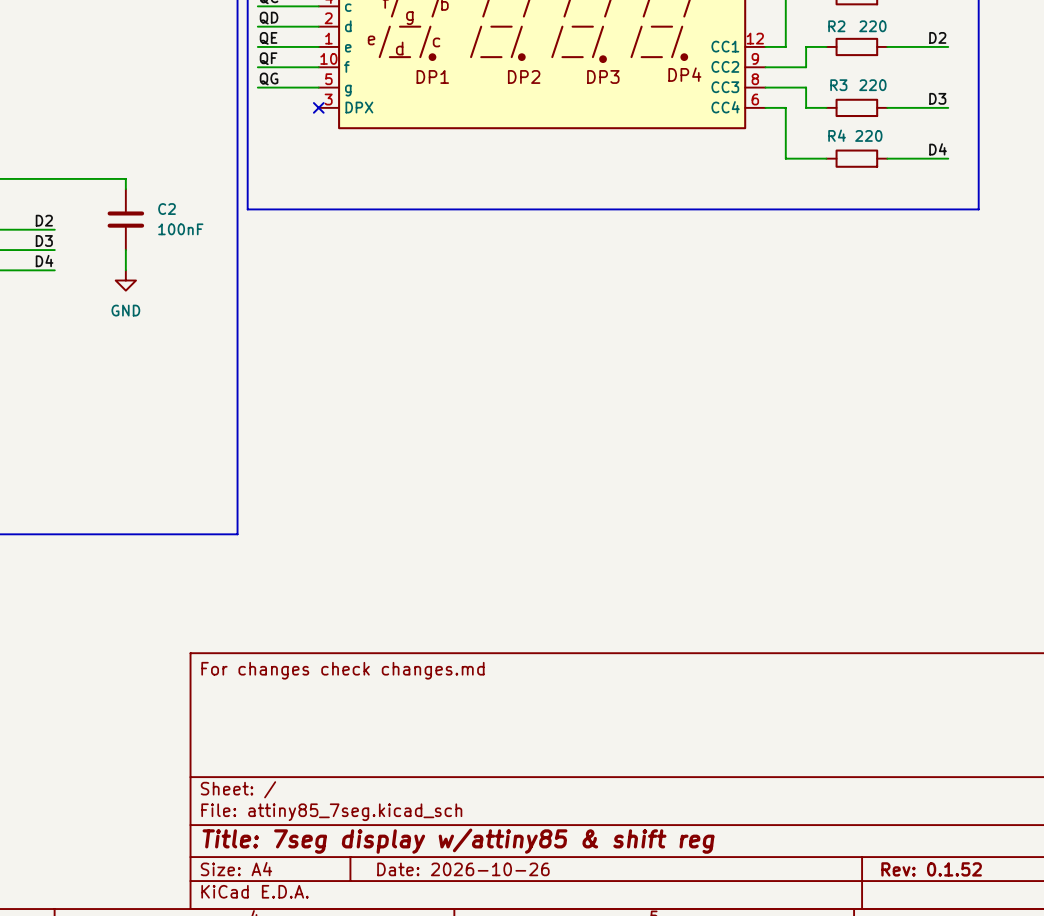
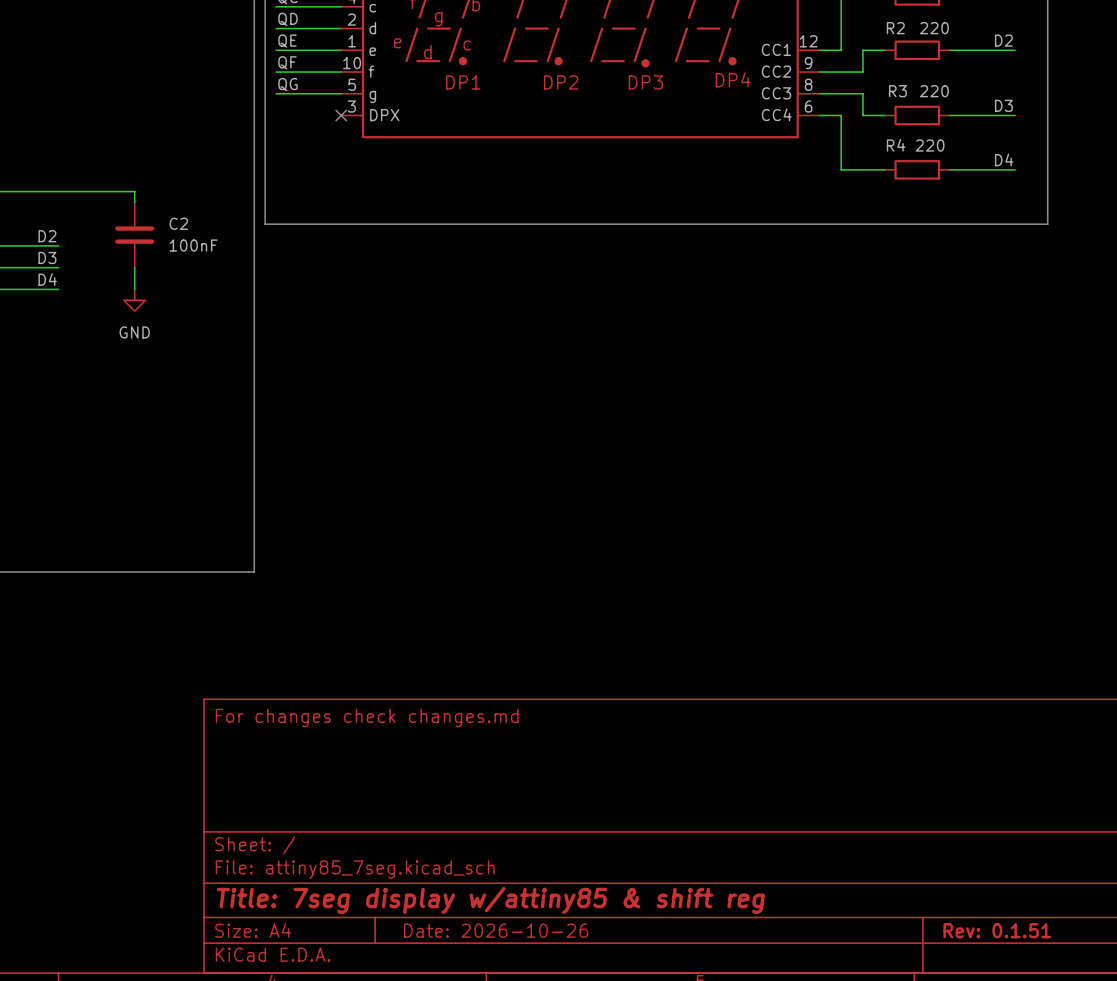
title block: Rev: 0.1.52 (931, 869) -> Rev: 0.1.51 (997, 930)

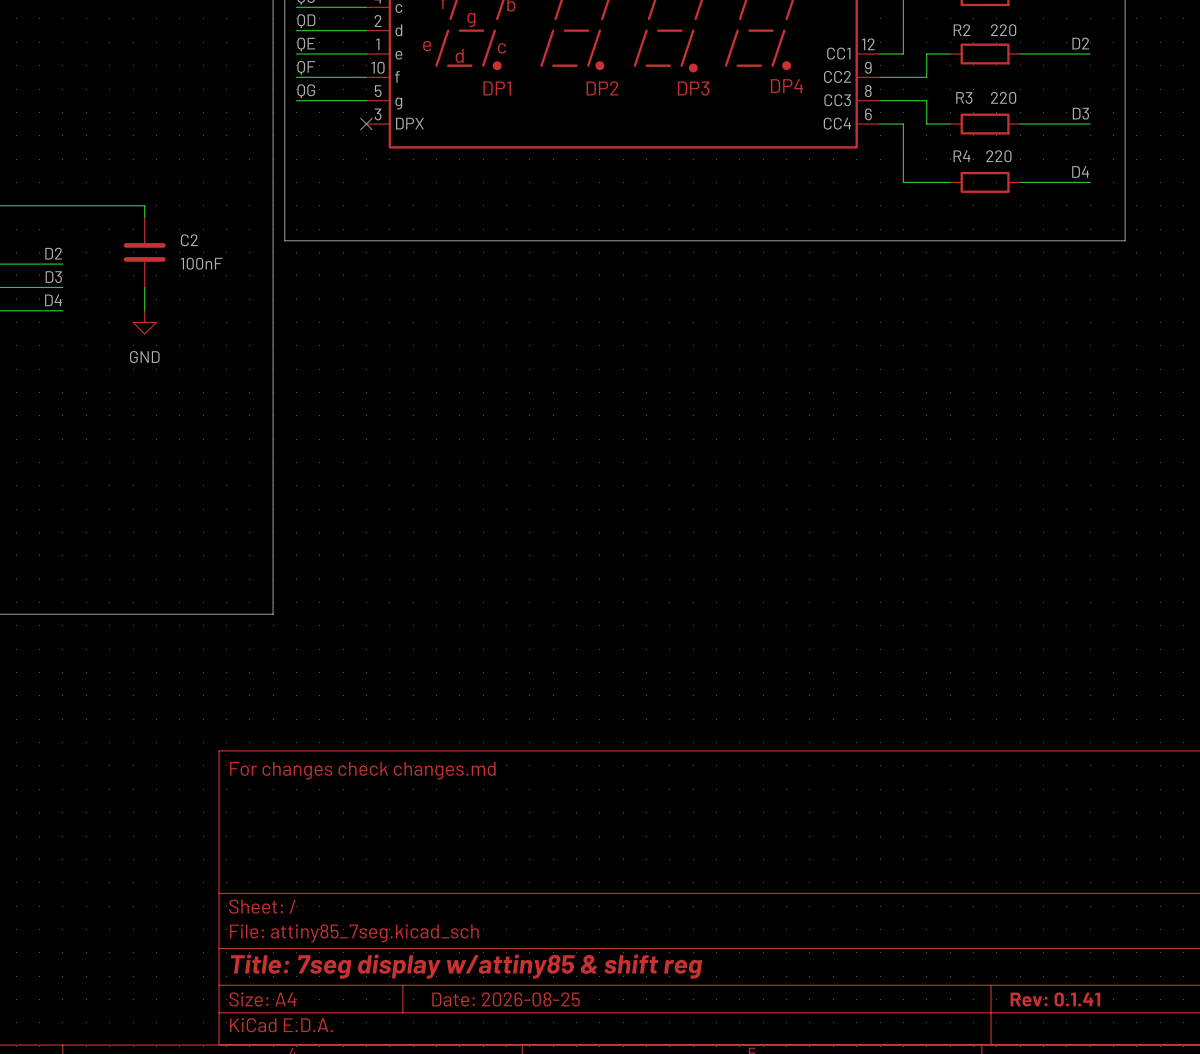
title block: Date: 2026-10-26 (496, 930) -> Date: 2026-08-25 (506, 999)
title block: Rev: 0.1.51 (997, 930) -> Rev: 0.1.41 (1055, 999)

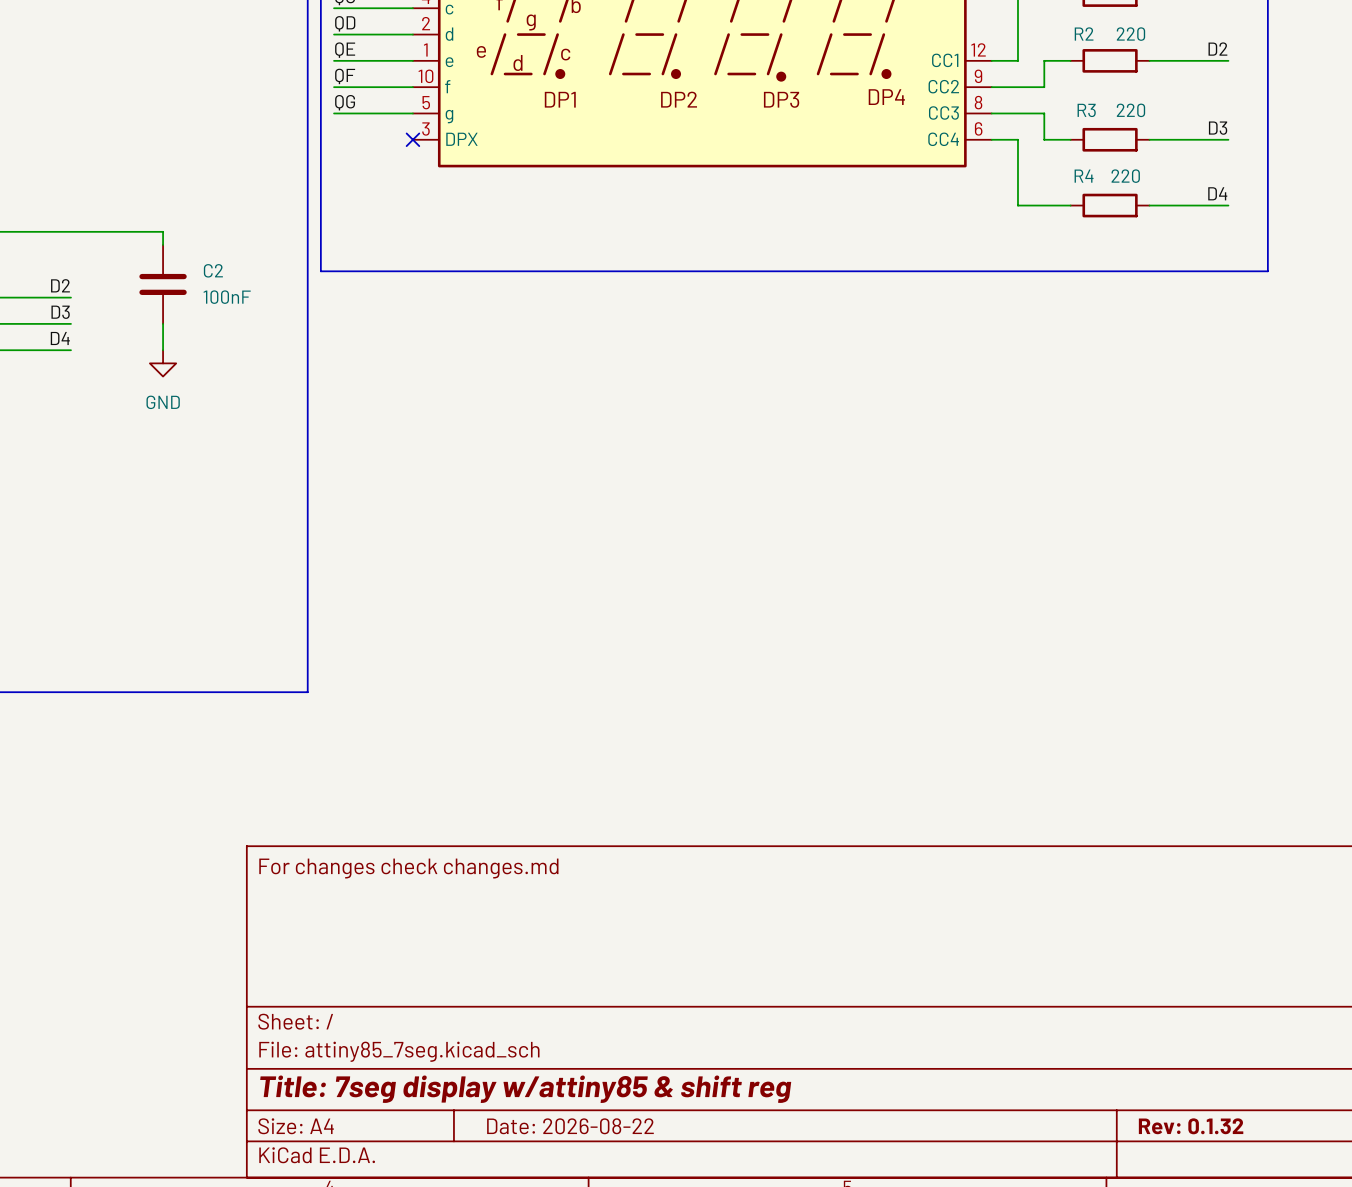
title block: Date: 2026-08-25 (506, 999) -> Date: 2026-08-22 (570, 1126)
title block: Rev: 0.1.41 (1055, 999) -> Rev: 0.1.32 (1191, 1126)

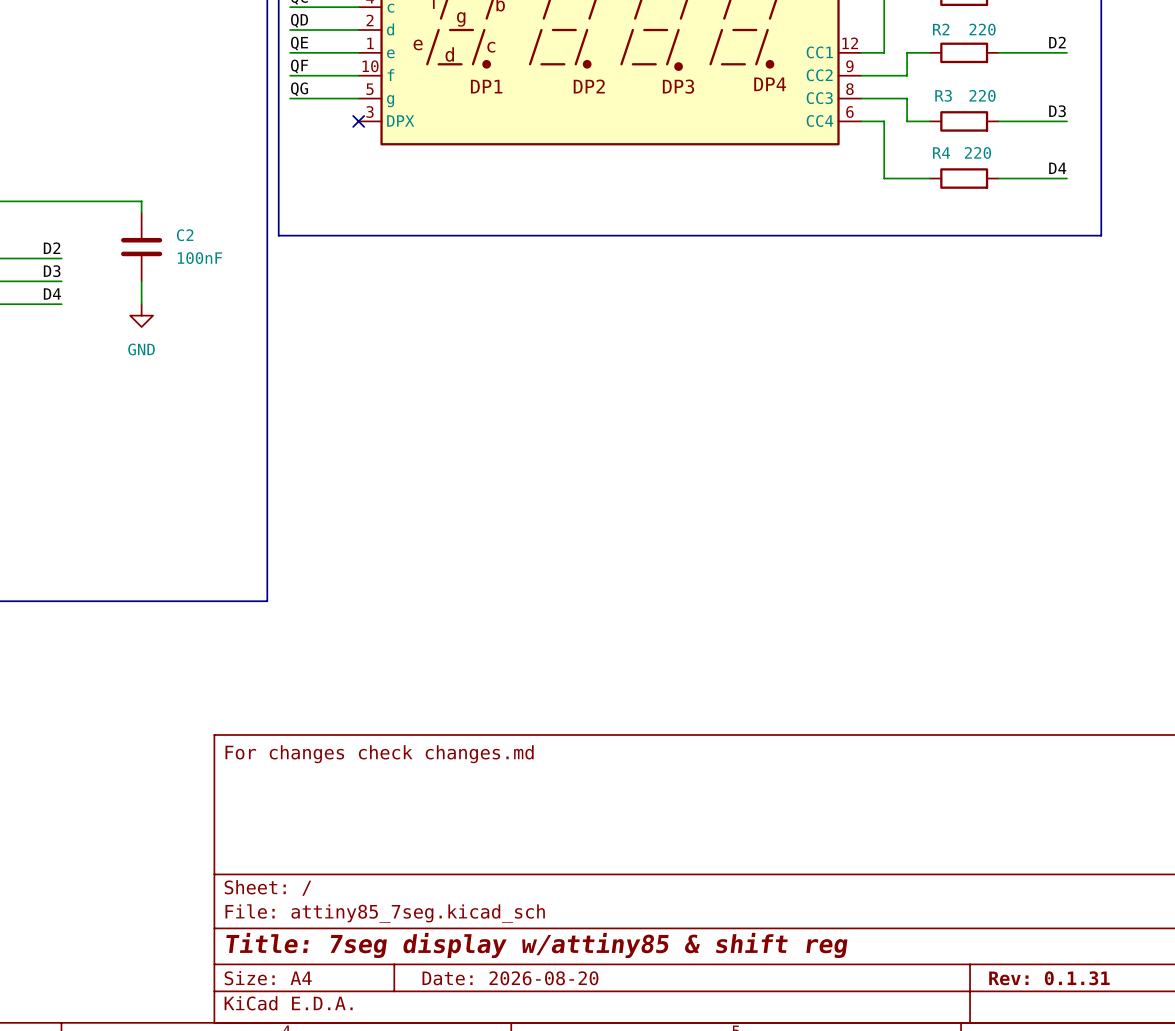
title block: Date: 2026-08-22 (570, 1126) -> Date: 2026-08-20 (510, 978)
title block: Rev: 0.1.32 (1191, 1126) -> Rev: 0.1.31 (1049, 978)

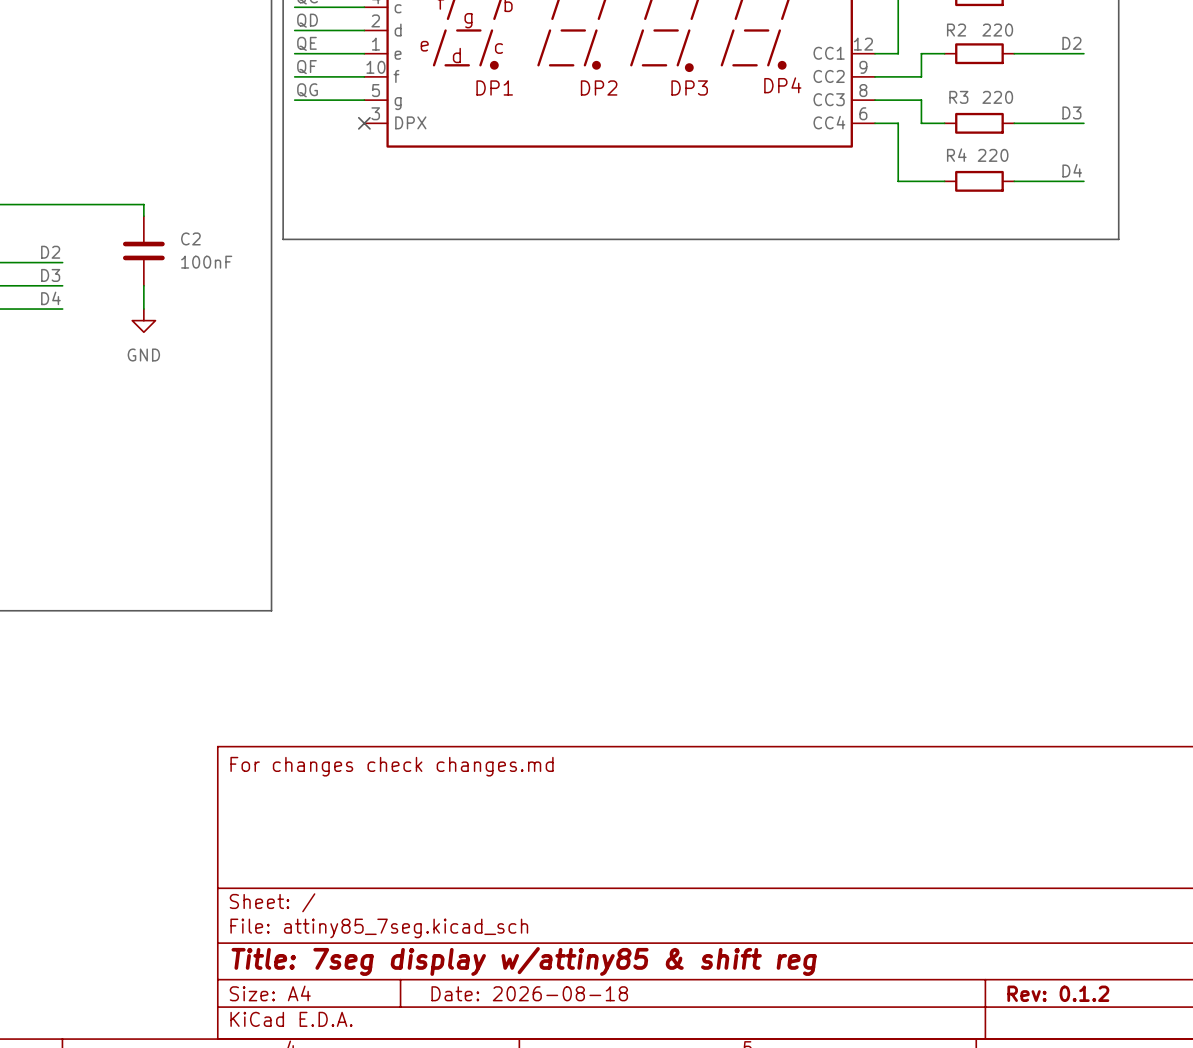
title block: Date: 2026-08-20 (510, 978) -> Date: 2026-08-18 (529, 993)
title block: Rev: 0.1.31 (1049, 978) -> Rev: 0.1.2 (1058, 993)

